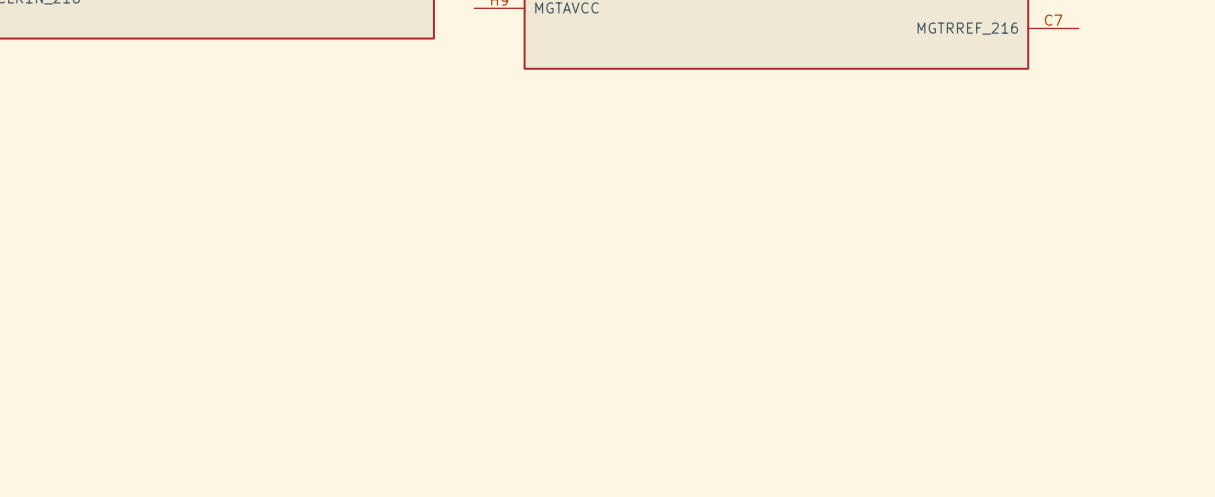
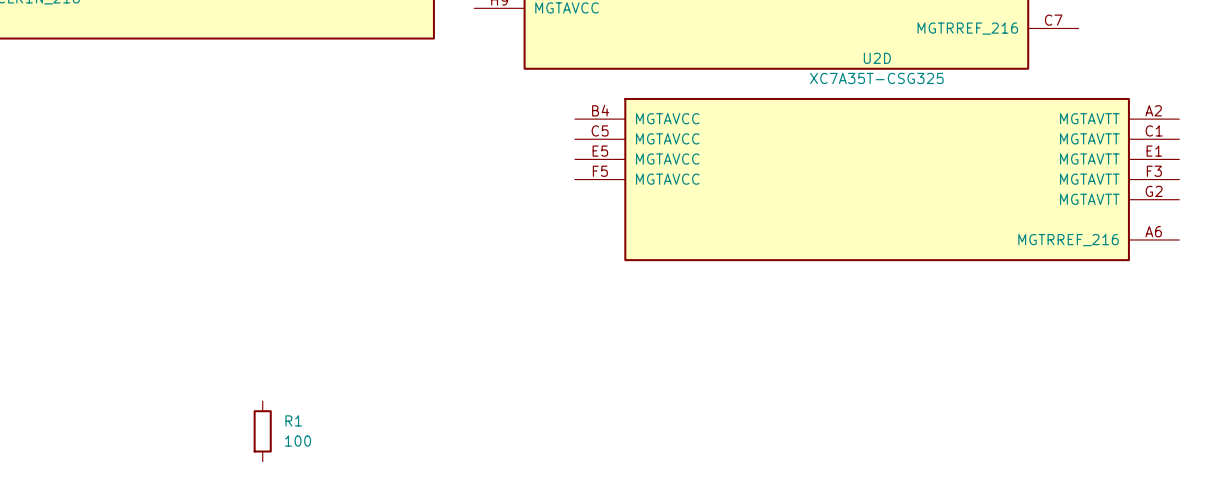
U2D: none -> XC7A35T-CSG325 (877, 179)
R1: none -> 100 (262, 431)

